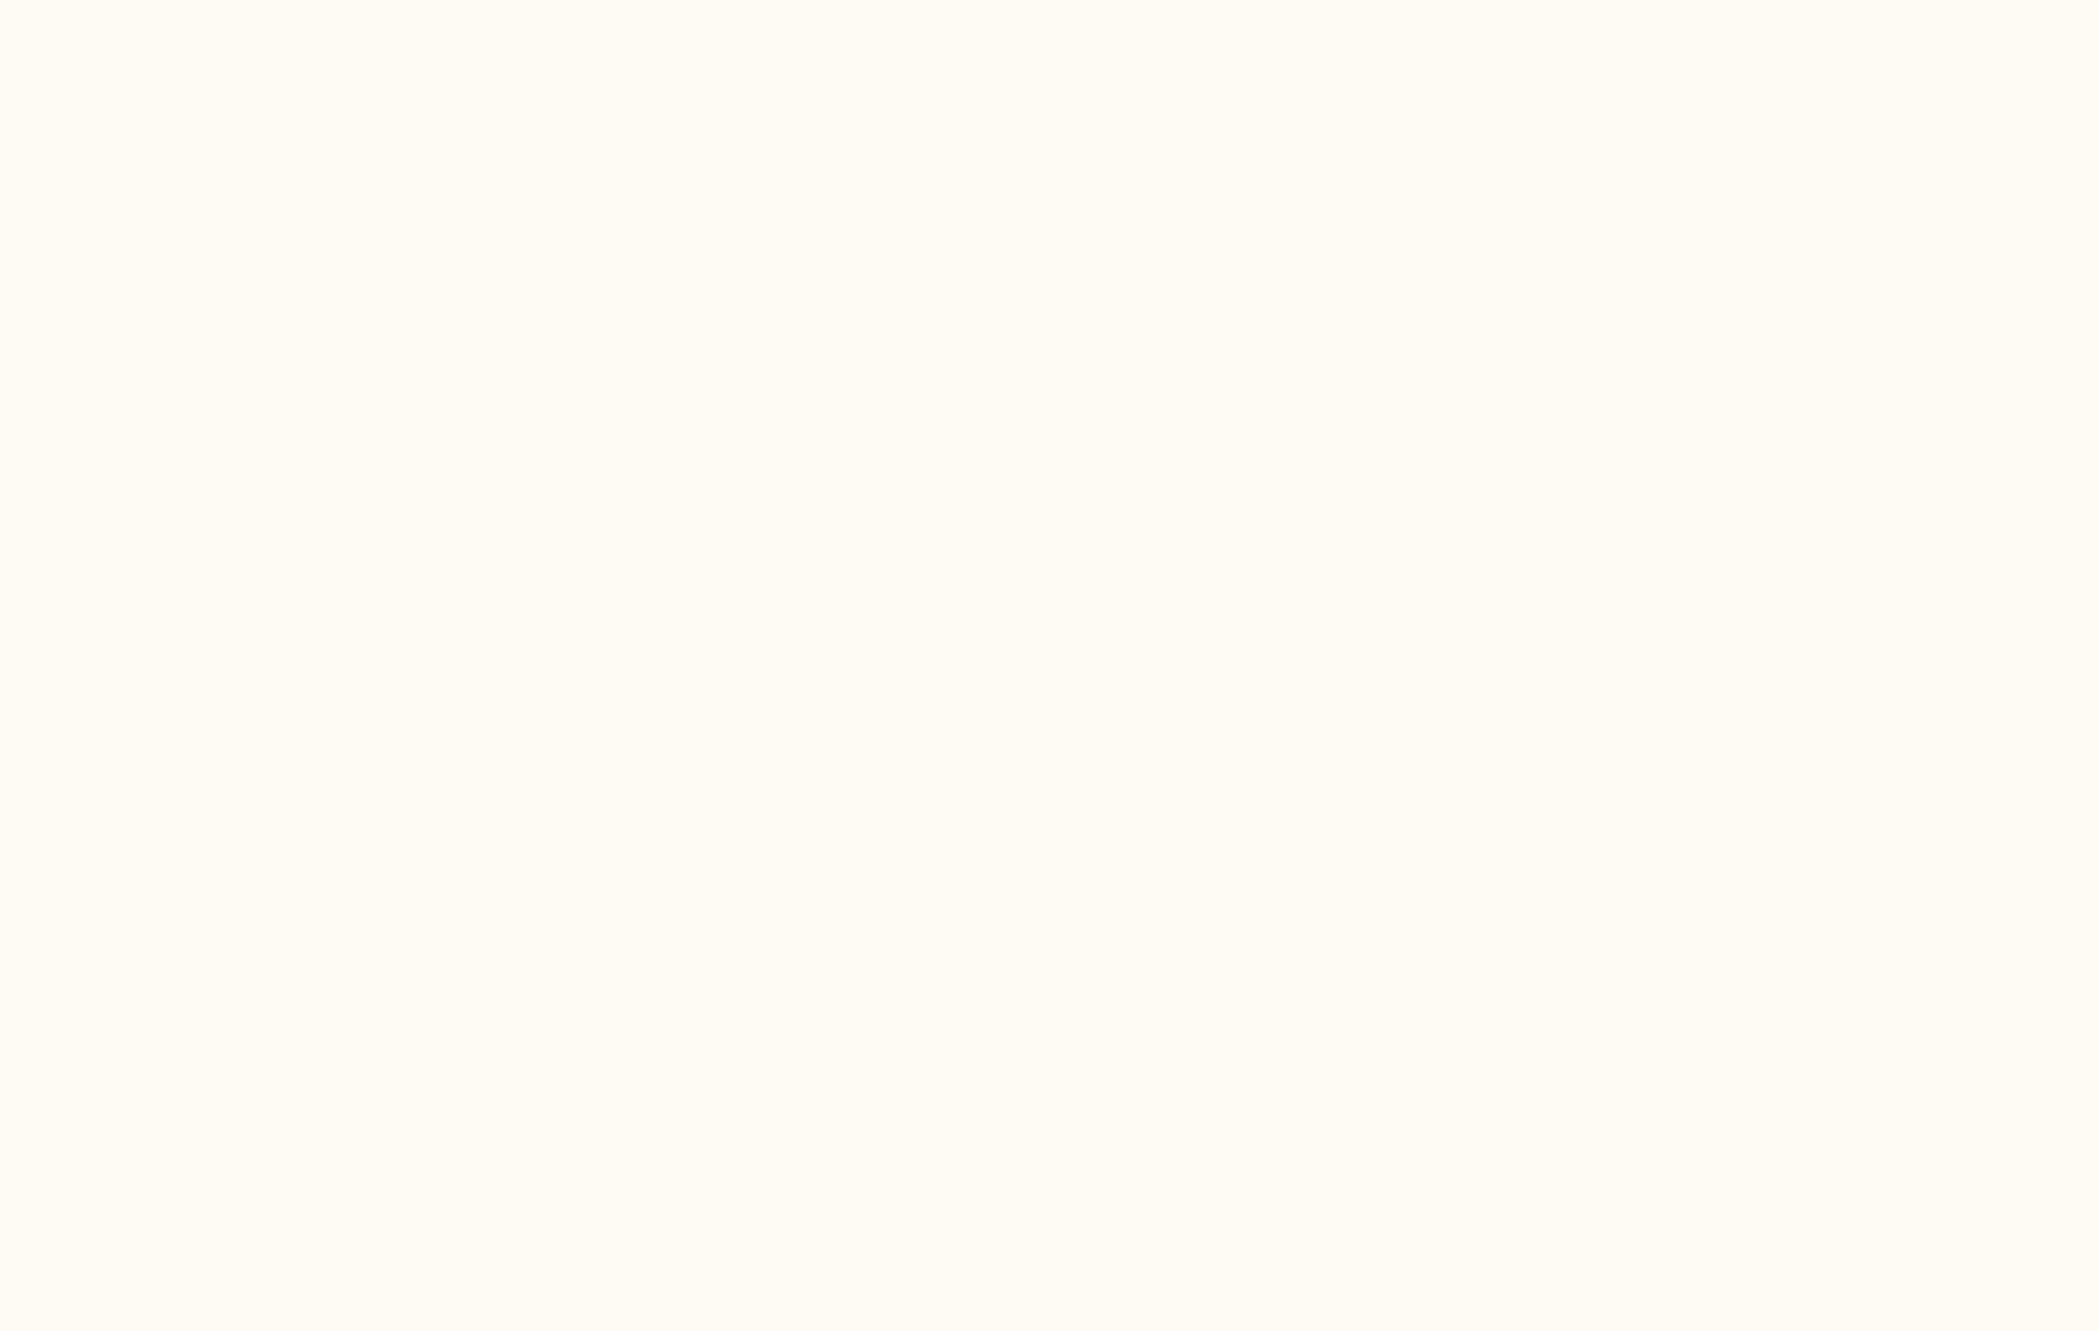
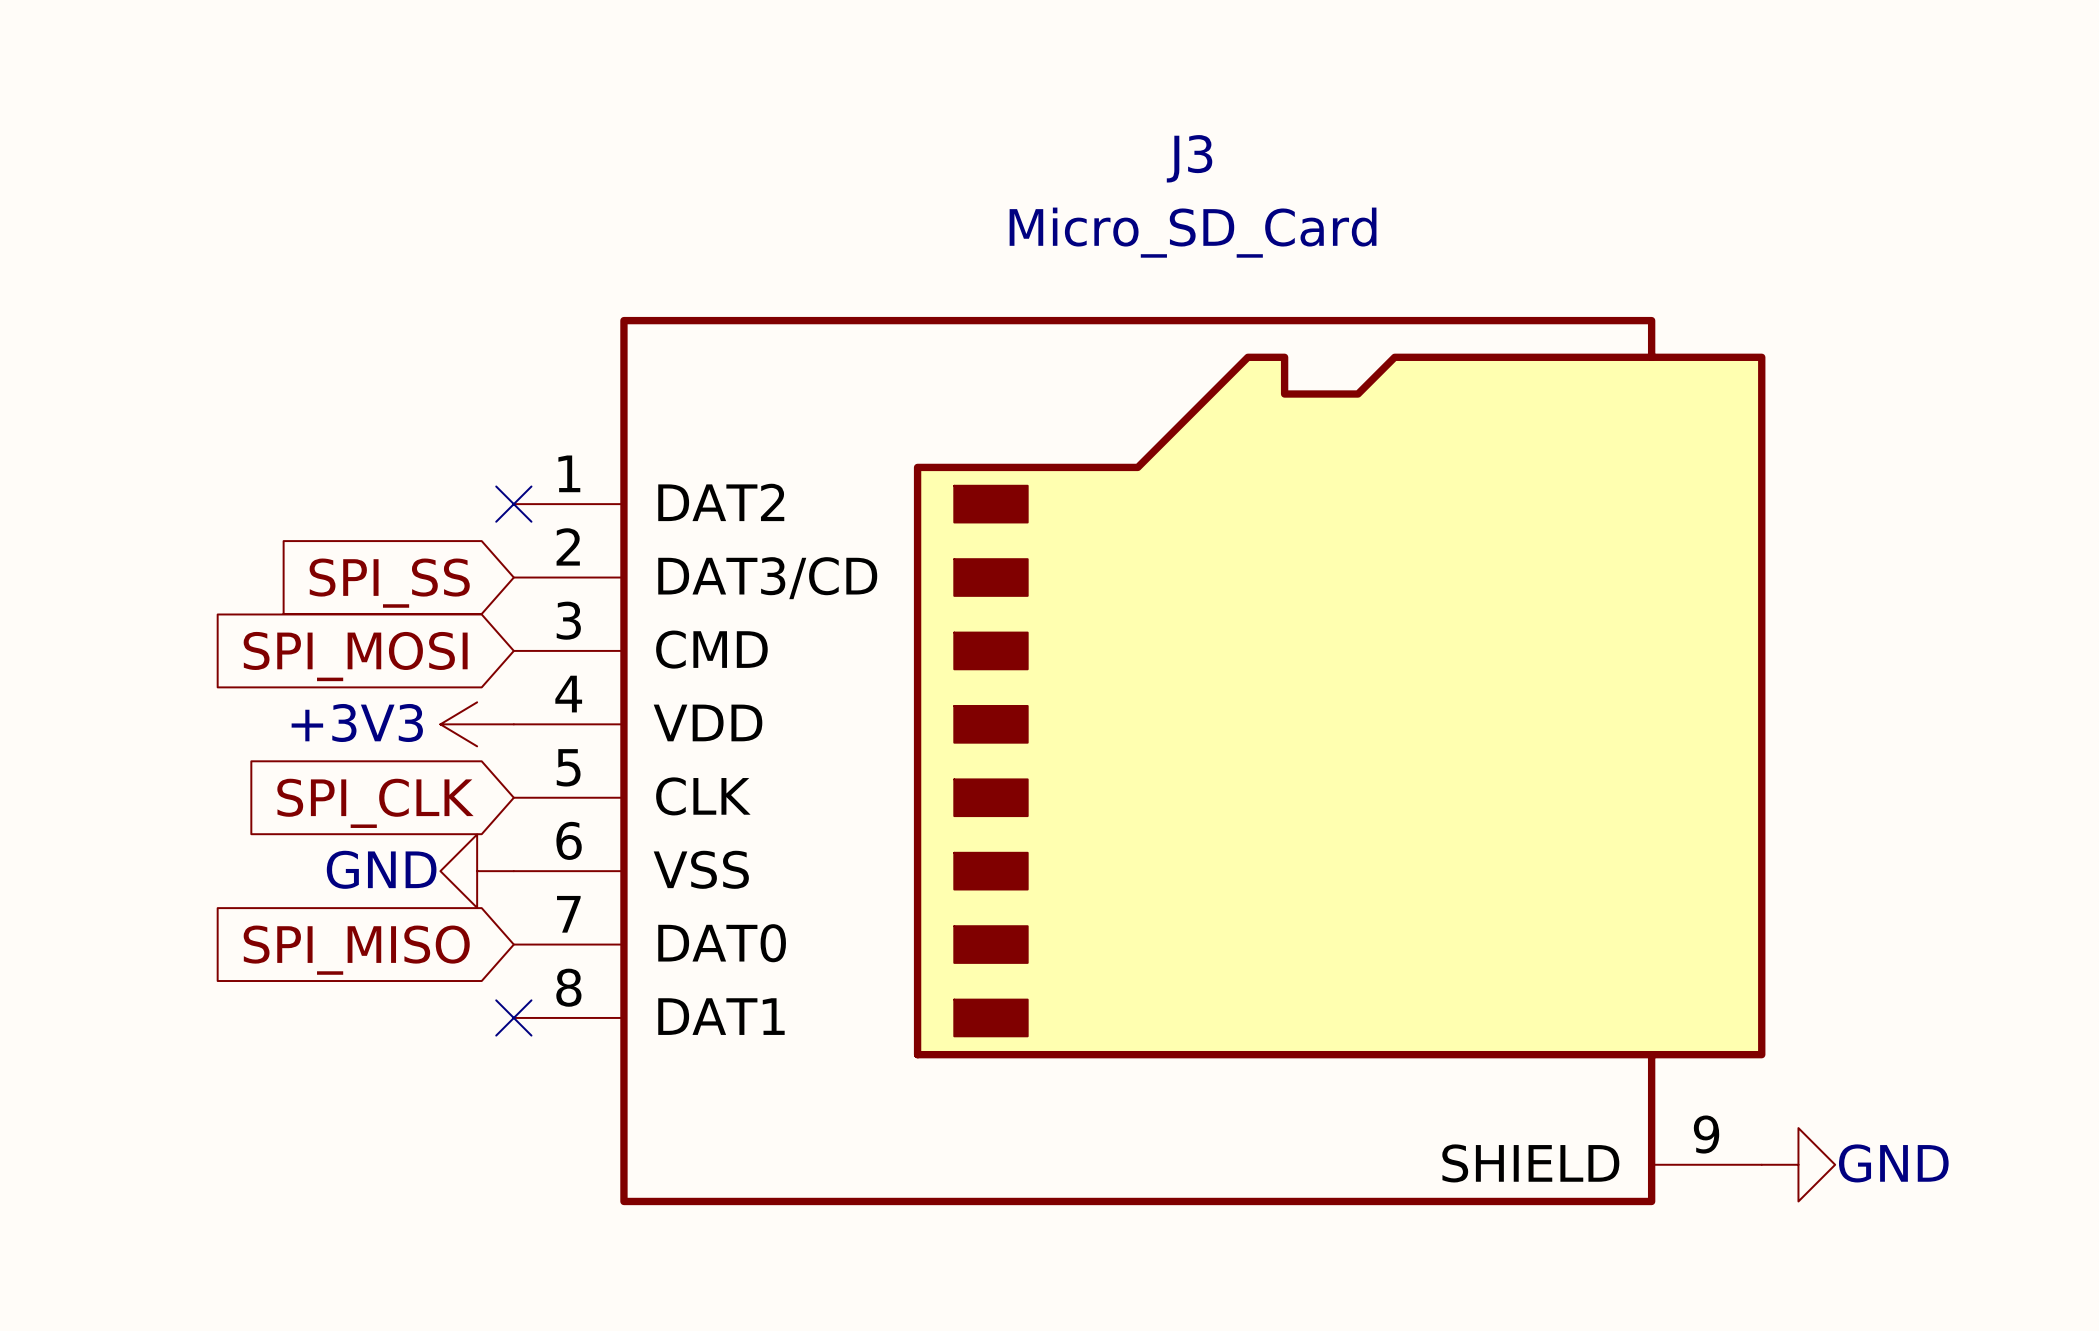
no-connect mark: none -> (513, 504)
global label: none -> SPI_SS (389, 583)
global label: none -> SPI_MOSI (355, 656)
power symbol: none -> +3V3 (477, 724)
J3: none -> Micro_SD_Card (1139, 761)
global label: none -> SPI_CLK (375, 803)
power symbol: none -> GND (477, 871)
global label: none -> SPI_MISO (356, 950)
no-connect mark: none -> (513, 1017)
power symbol: none -> GND (1798, 1164)

